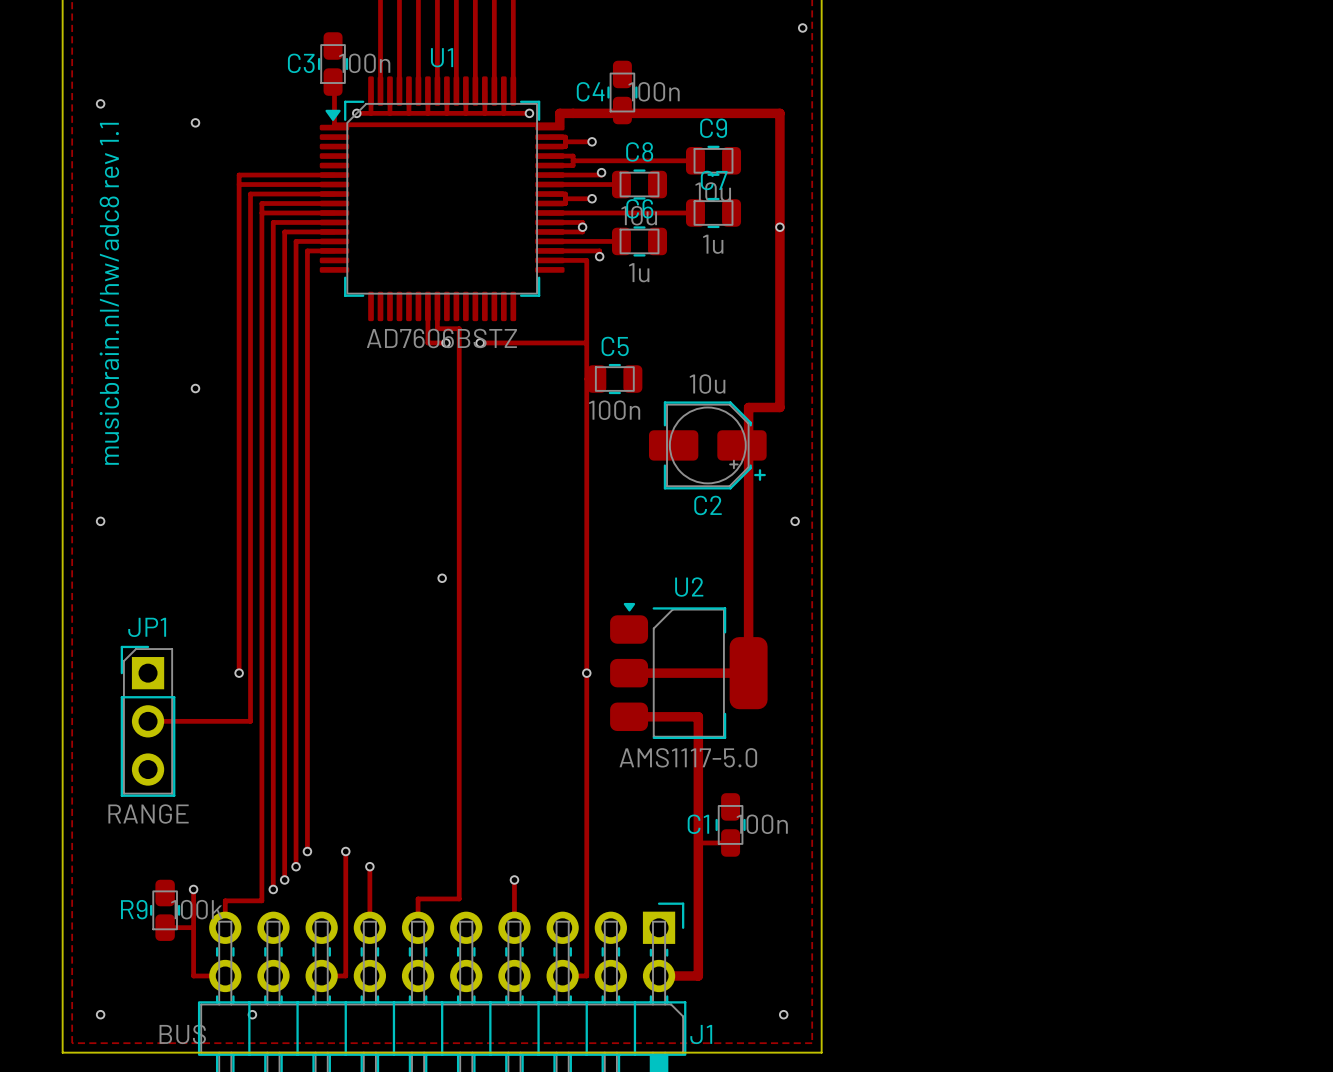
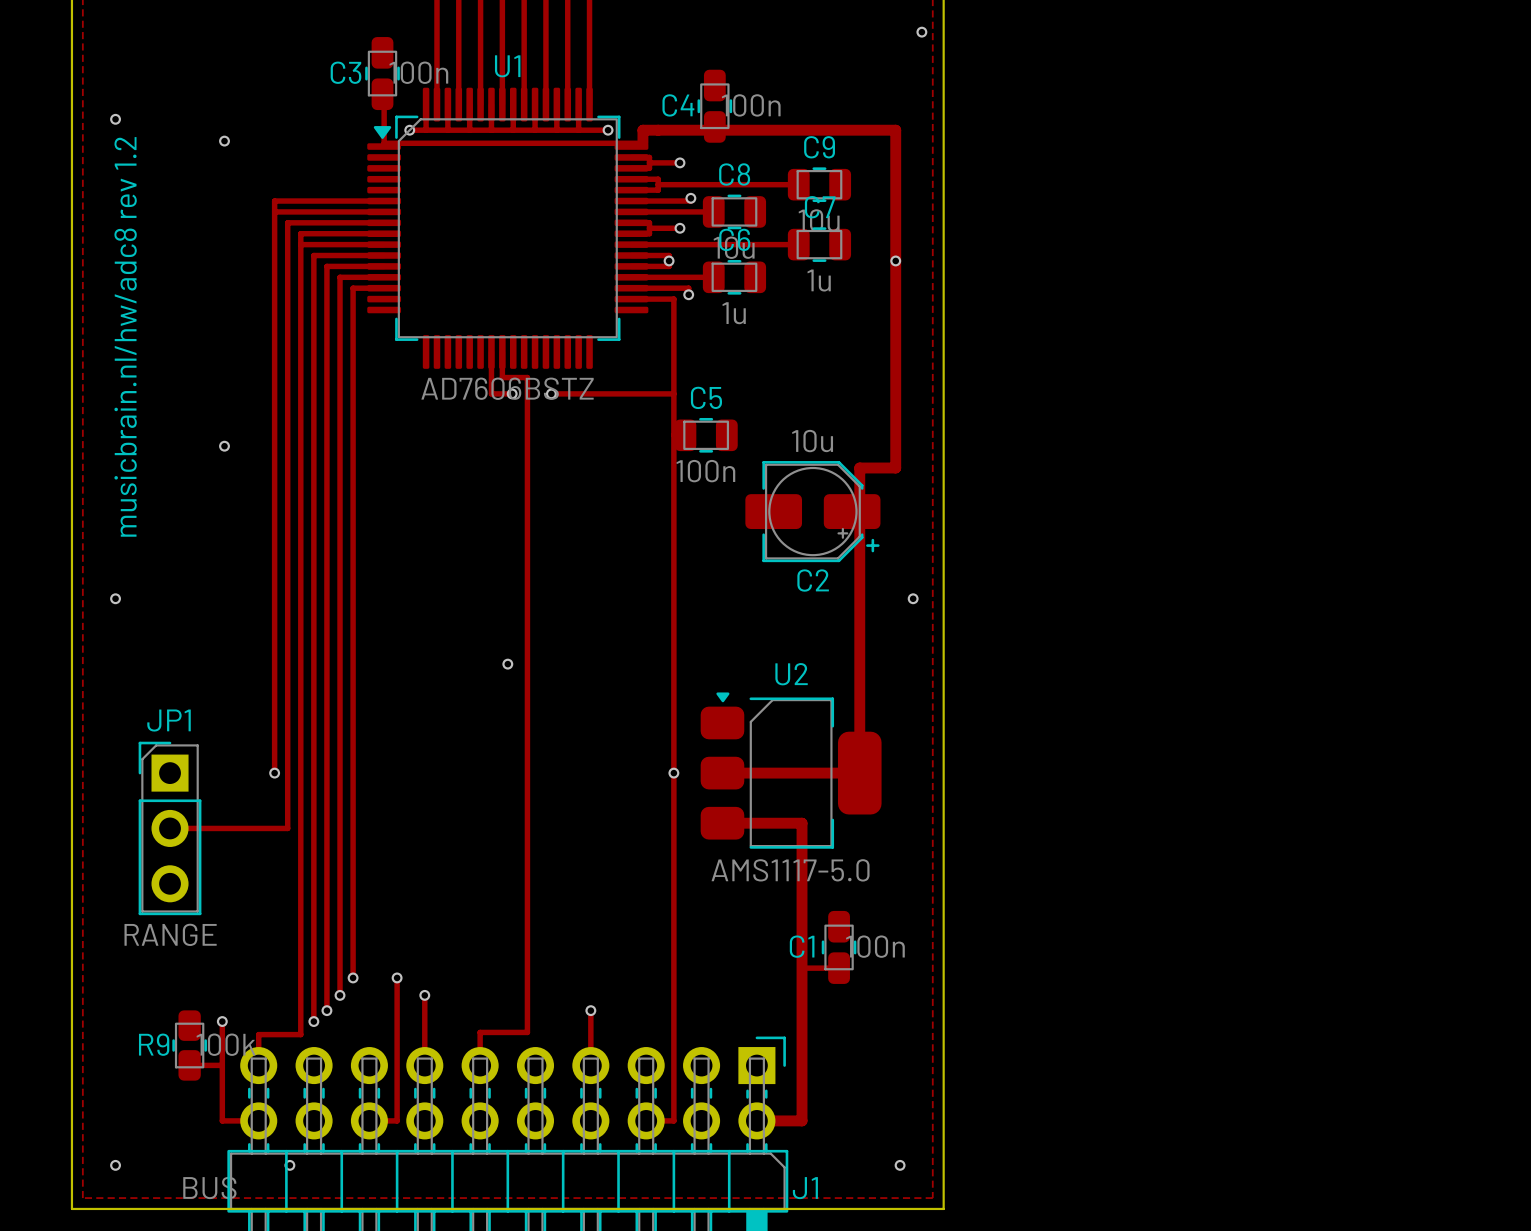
text: musicbrain.nl/hw/adc8 rev 1.1 (109, 293) -> musicbrain.nl/hw/adc8 rev 1.2 (125, 336)

